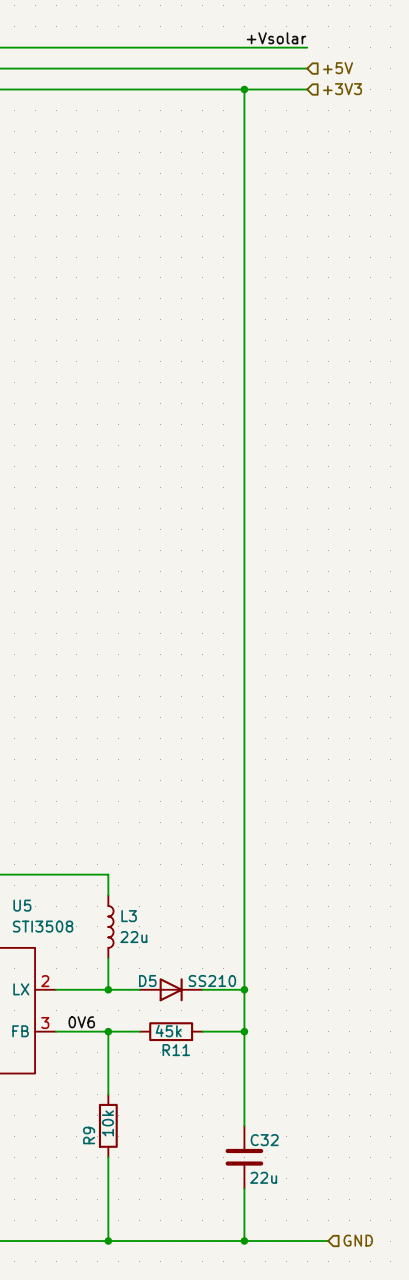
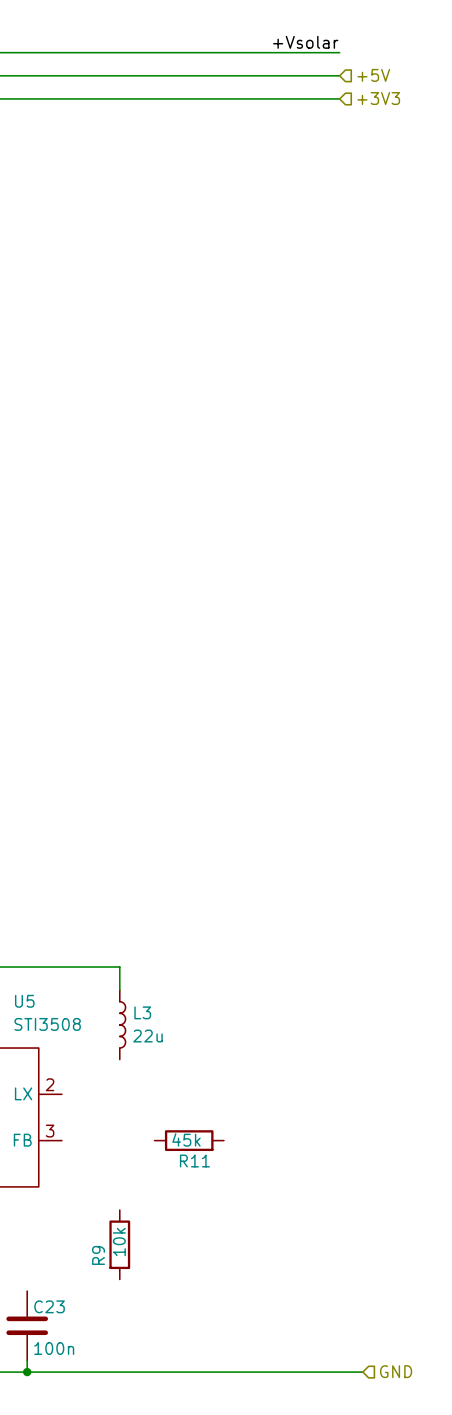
wire: (244, 89) (244, 1125) -> none
junction: (244, 89) -> none
wire: (108, 958) (108, 989) -> none
wire: (56, 989) (139, 989) -> none
junction: (108, 989) -> none
D5: SS210 (171, 989) -> none
wire: (202, 989) (244, 989) -> none
junction: (244, 989) -> none
label: 0V6 (81, 1022) -> none
wire: (56, 1031) (139, 1031) -> none
wire: (108, 1031) (108, 1094) -> none
junction: (108, 1031) -> none
wire: (202, 1031) (244, 1031) -> none
junction: (244, 1031) -> none
wire: (108, 1157) (108, 1241) -> none
C32: 22u (244, 1157) -> none
wire: (244, 1188) (244, 1241) -> none
C23: none -> 100n (27, 1325)
wire: none -> (27, 1360) (27, 1372)
junction: none -> (27, 1372)
junction: (108, 1241) -> none
junction: (244, 1241) -> none

